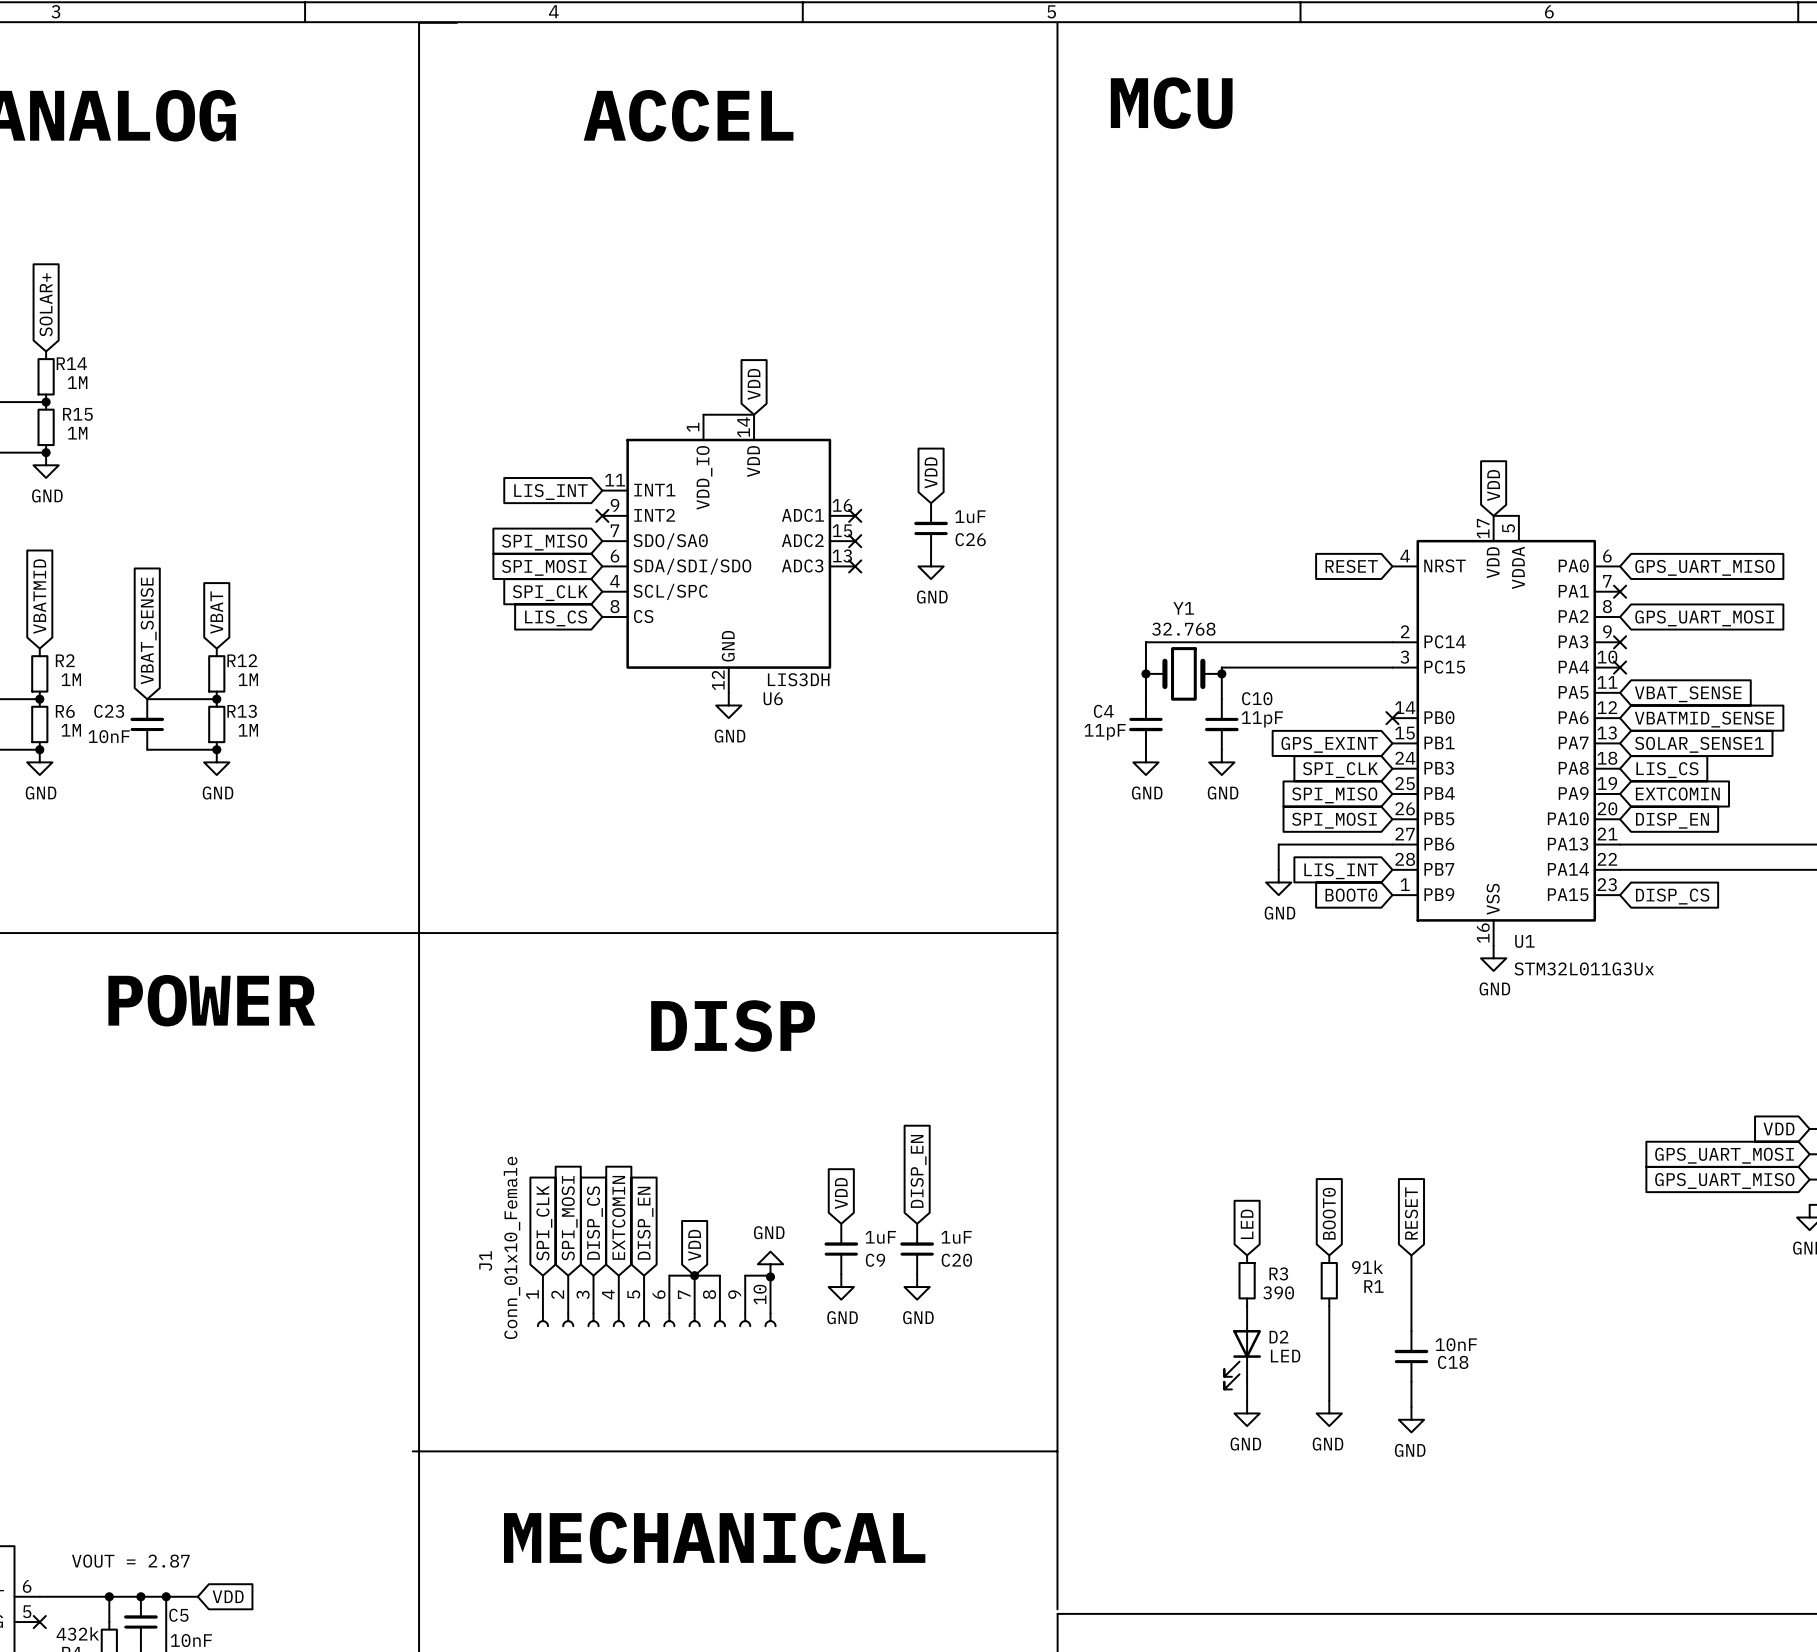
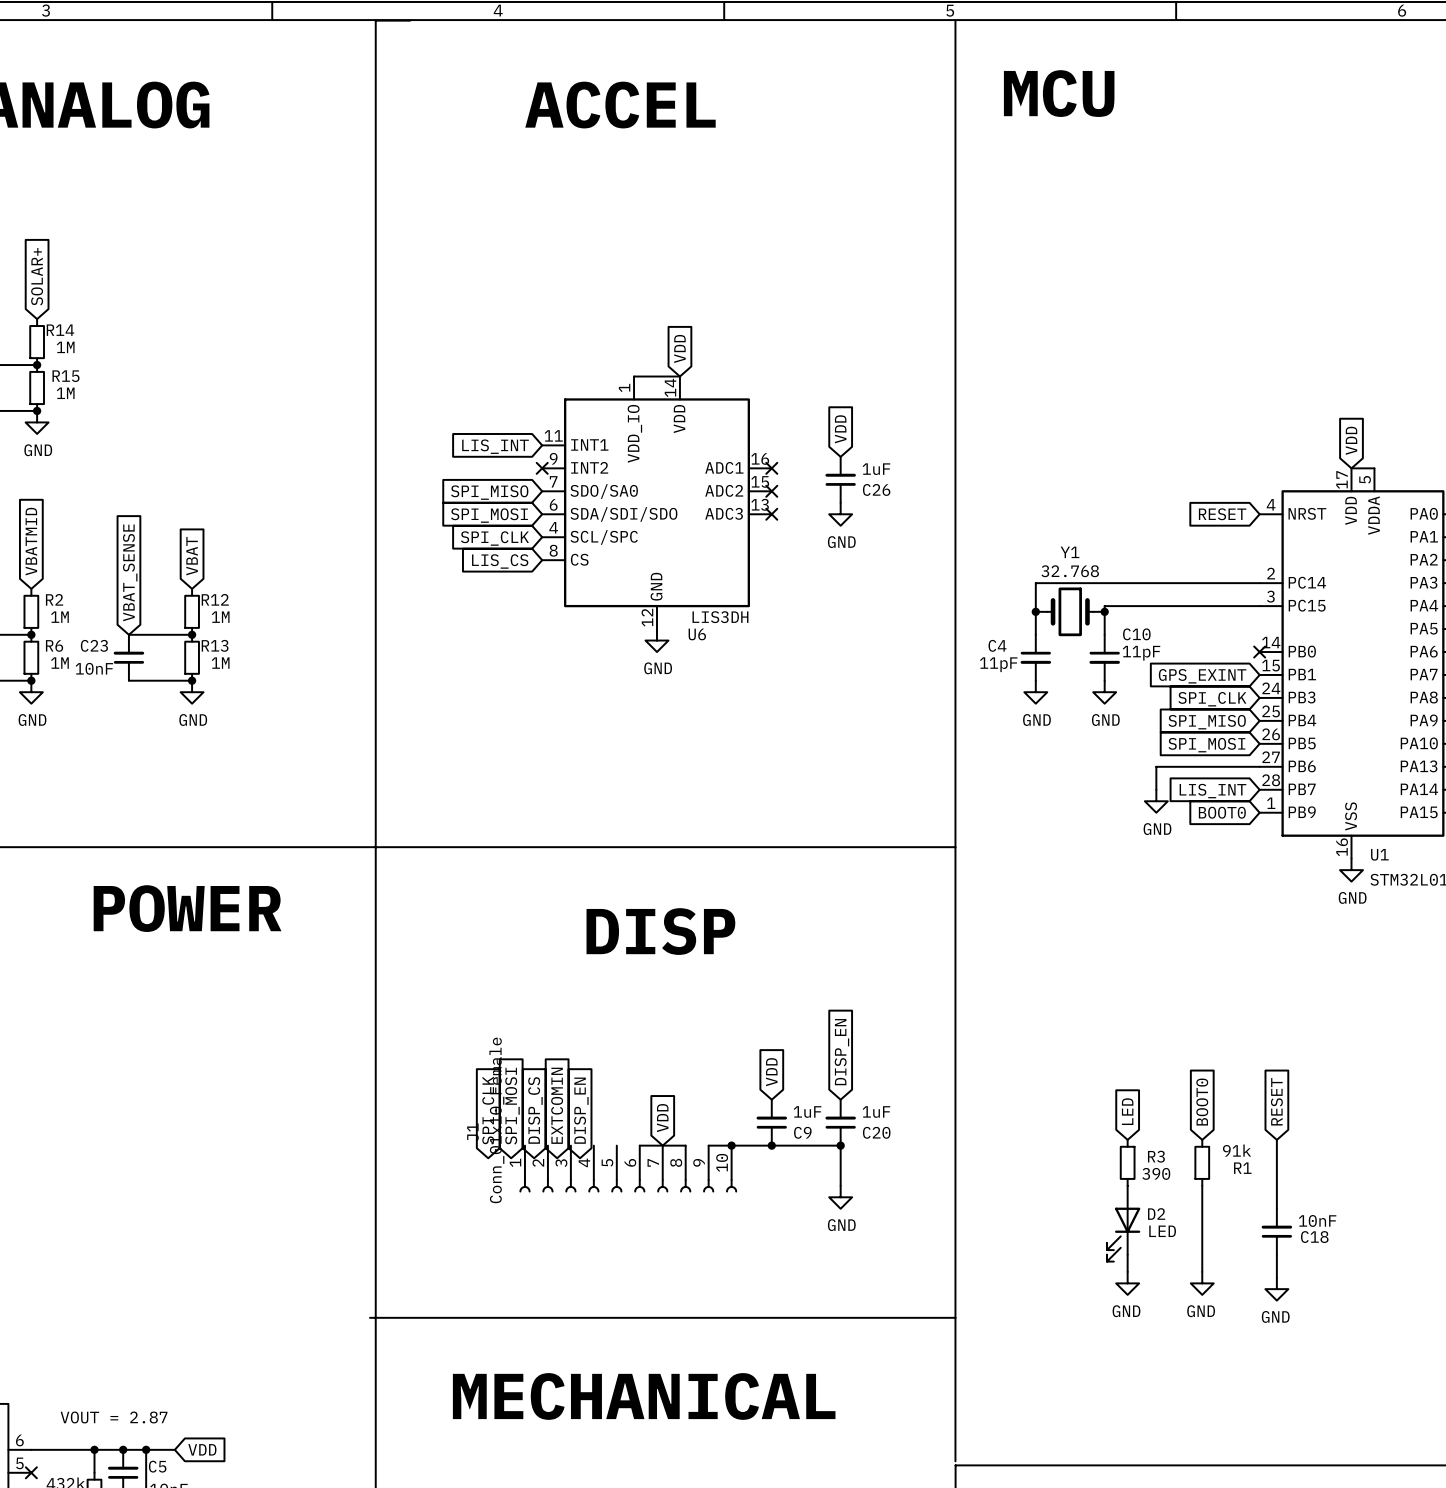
global label position: DISP_EN (918, 1171) -> DISP_EN (841, 1052)
global label position: VDD (841, 1193) -> VDD (771, 1072)
global label position: VDD (694, 1245) -> VDD (662, 1118)
C9 position: (841, 1249) -> (771, 1122)
C20 position: (917, 1249) -> (840, 1122)
wire: none -> (708, 1145) (840, 1145) (840, 1185)
junction: none -> (731, 1145)
junction: none -> (771, 1145)
junction: none -> (840, 1145)
power symbol: GND (770, 1264) -> none
wire: (669, 1275) (719, 1275) -> (639, 1145) (685, 1145)
junction: (694, 1275) -> none
wire: (745, 1275) (770, 1275) -> none
junction: (770, 1276) -> none
power symbol: GND (841, 1287) -> none
power symbol position: GND (917, 1287) -> GND (840, 1197)
J1 position: (656, 1301) -> (628, 1168)

